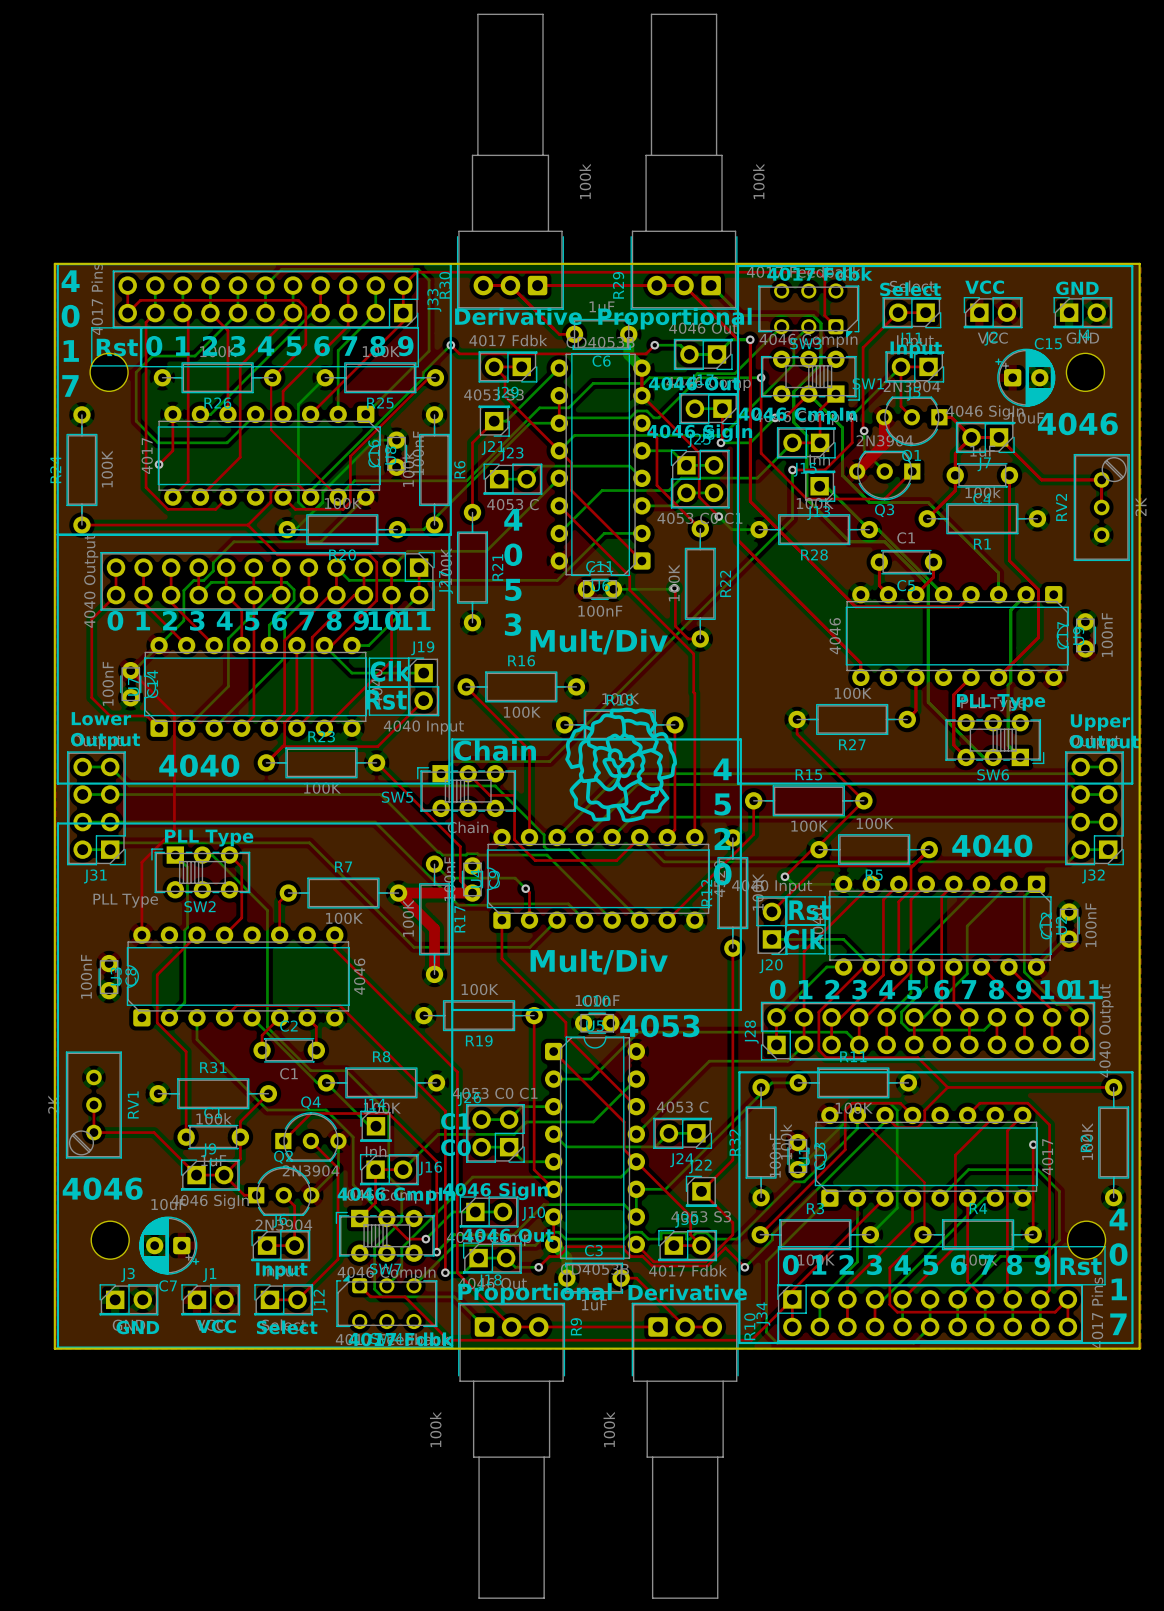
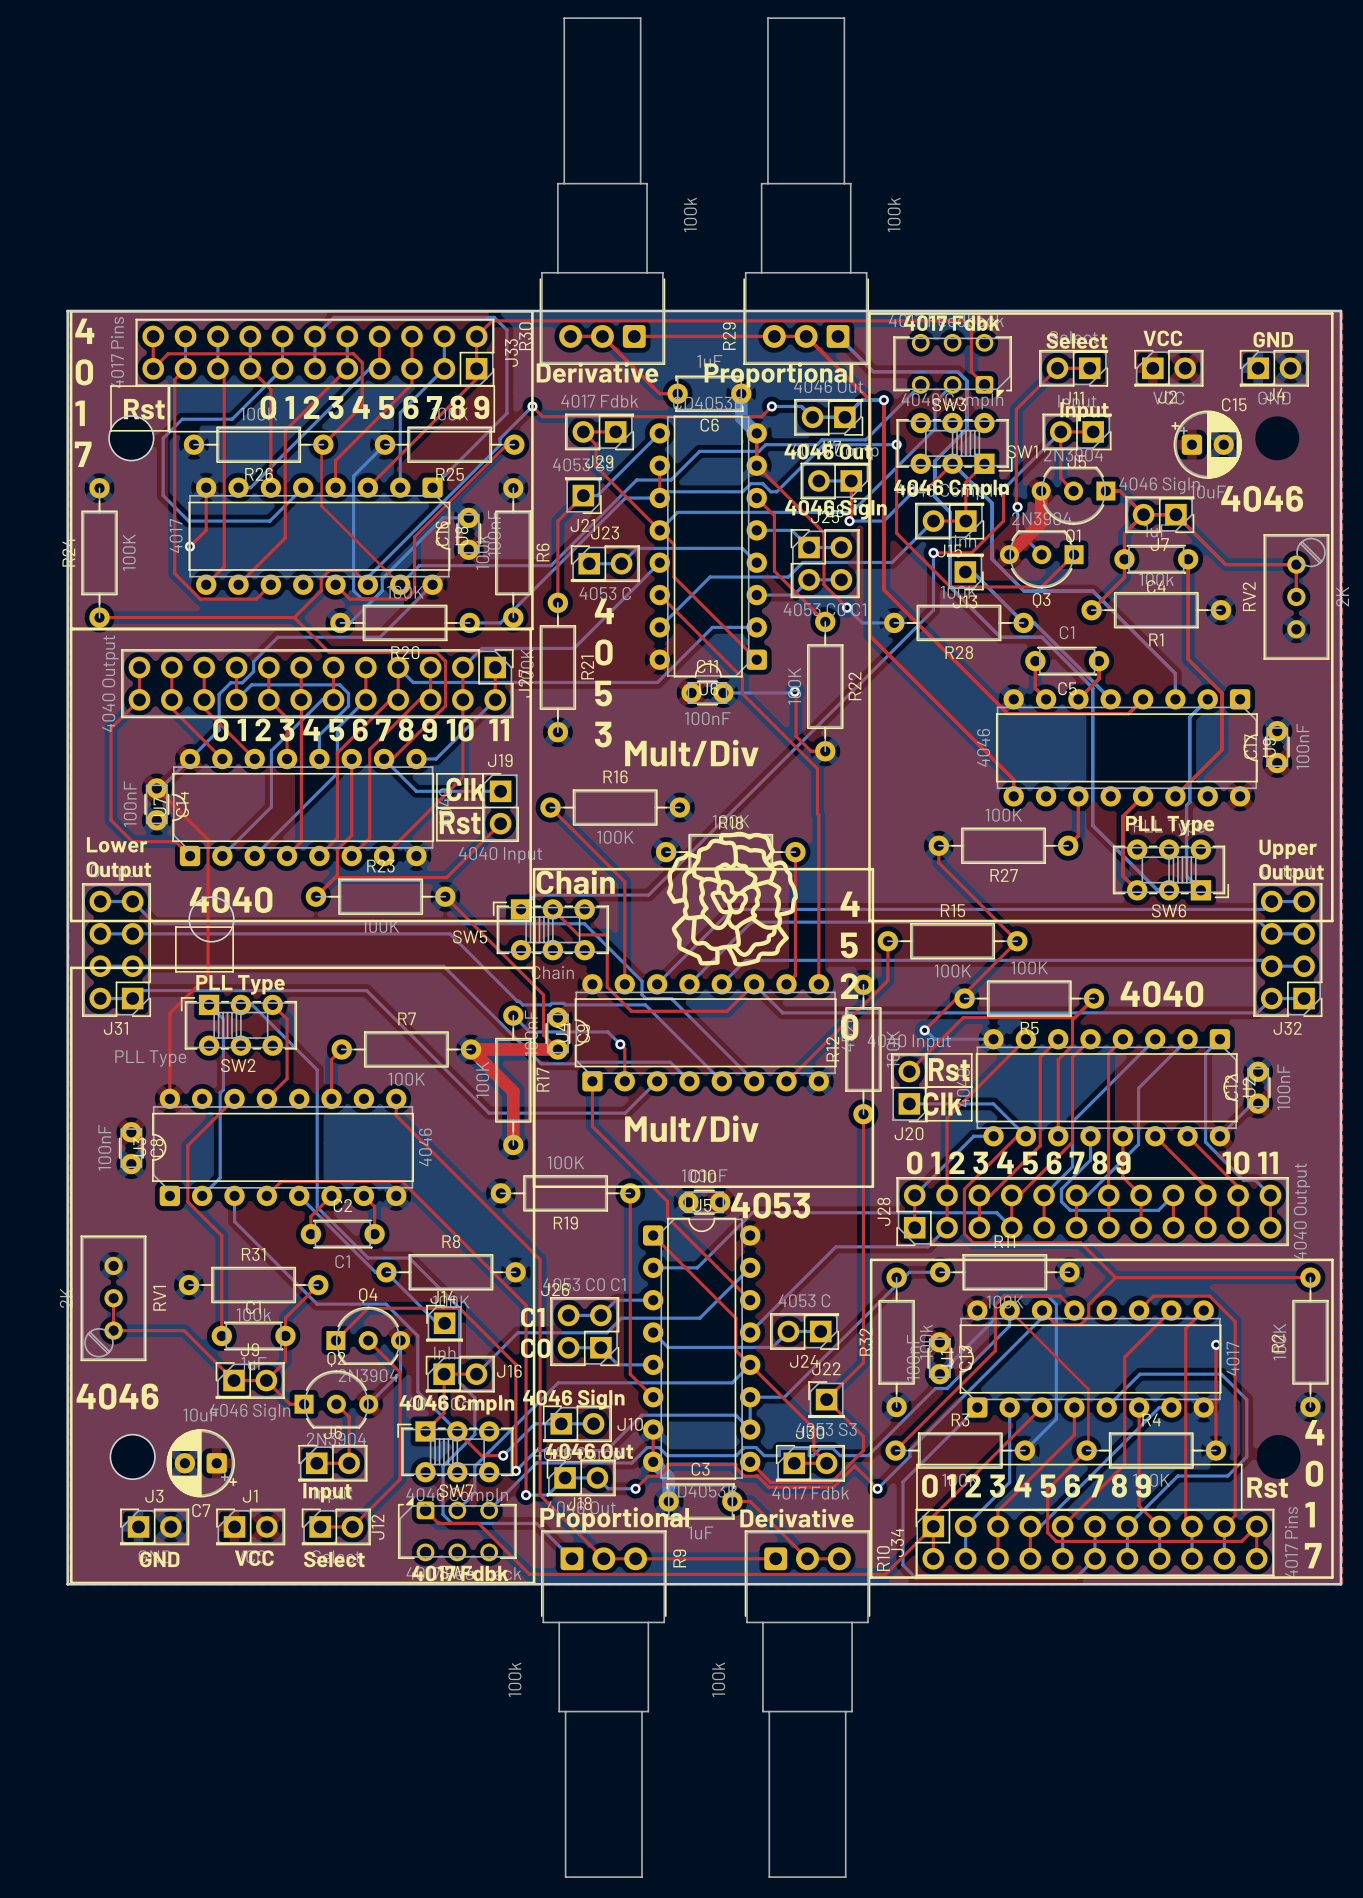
round board edge: [1066, 353, 1105, 392] -> none
round board edge: none -> [188, 896, 235, 943]
line: none -> (175, 927) (233, 927) (233, 971) (175, 971) (175, 927)
round board edge: [1067, 1220, 1106, 1260] -> none
line: (1056, 1246) (1104, 1246) (1104, 1284) (1056, 1284) (1056, 1246) -> none

